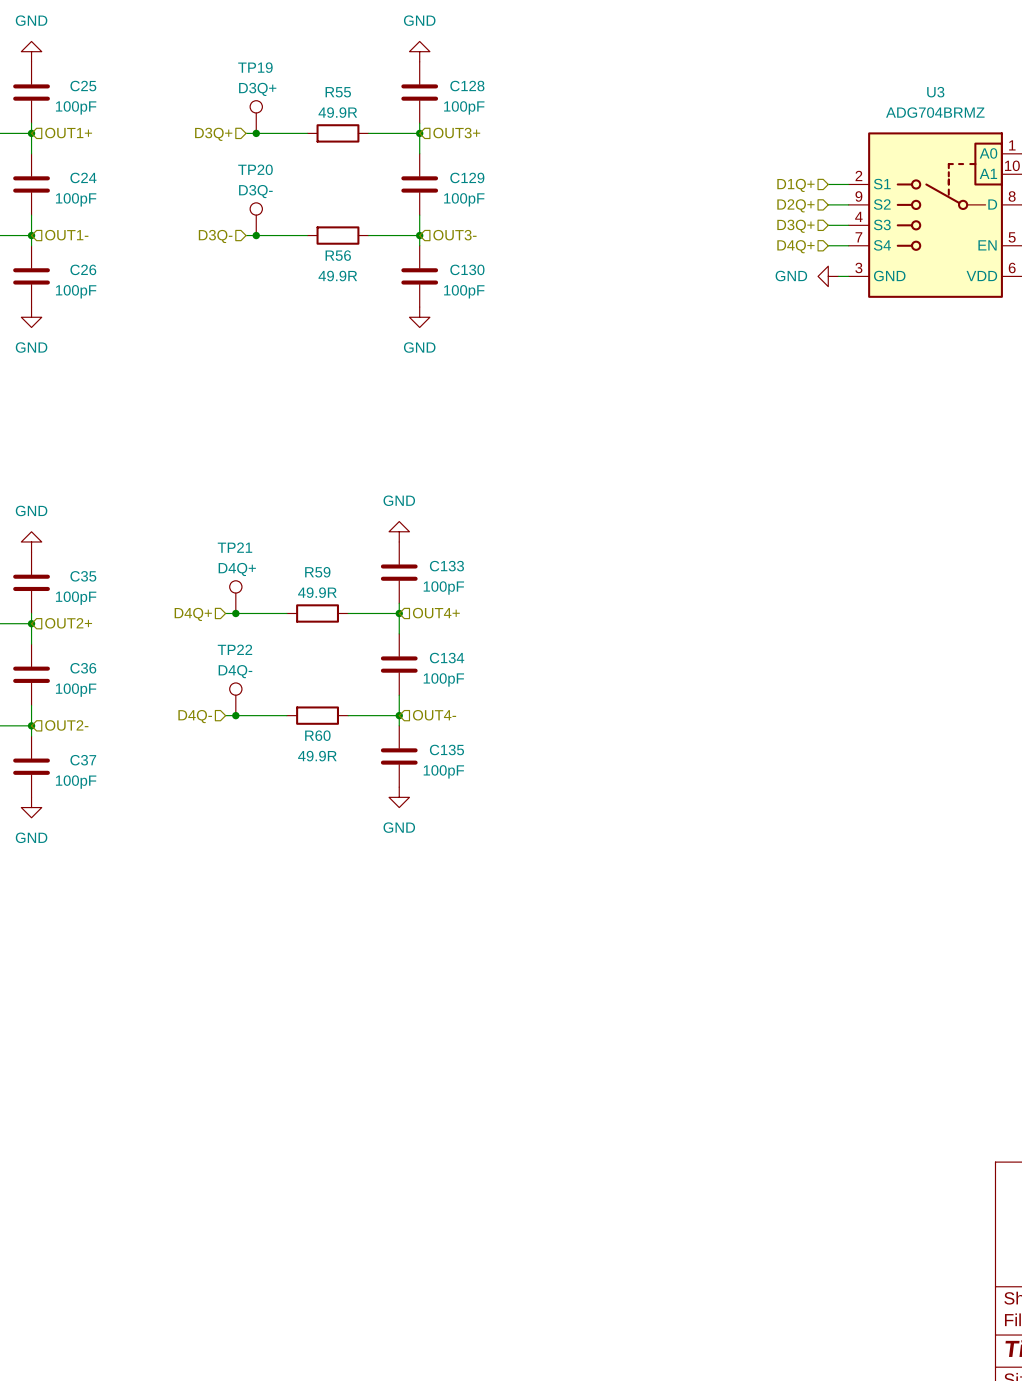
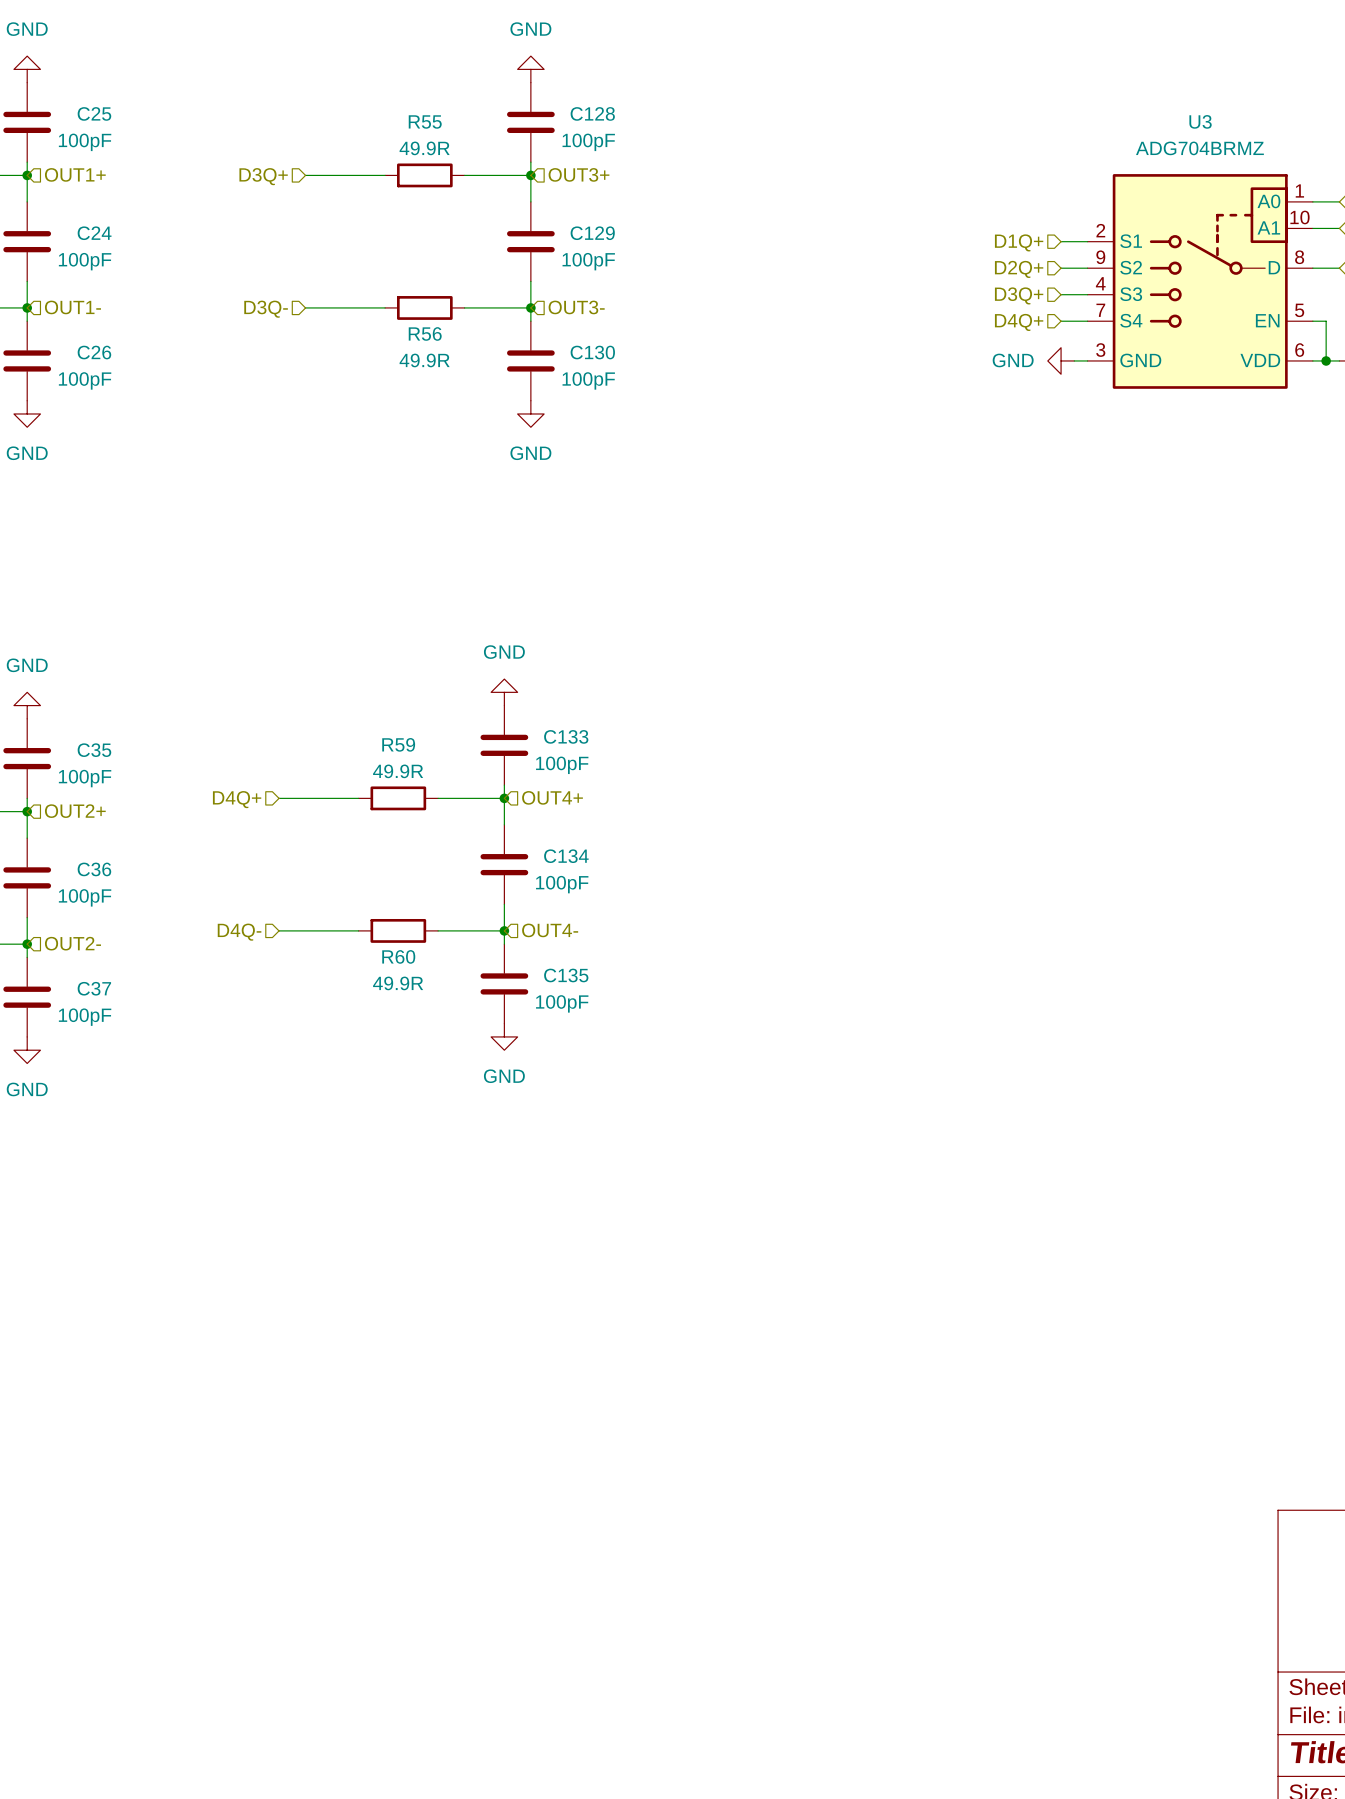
TP19: D3Q+ (256, 117) -> none
junction: (256, 133) -> none
TP20: D3Q- (256, 219) -> none
junction: (256, 235) -> none
TP21: D4Q+ (235, 597) -> none
junction: (235, 613) -> none
TP22: D4Q- (235, 699) -> none
junction: (235, 715) -> none

